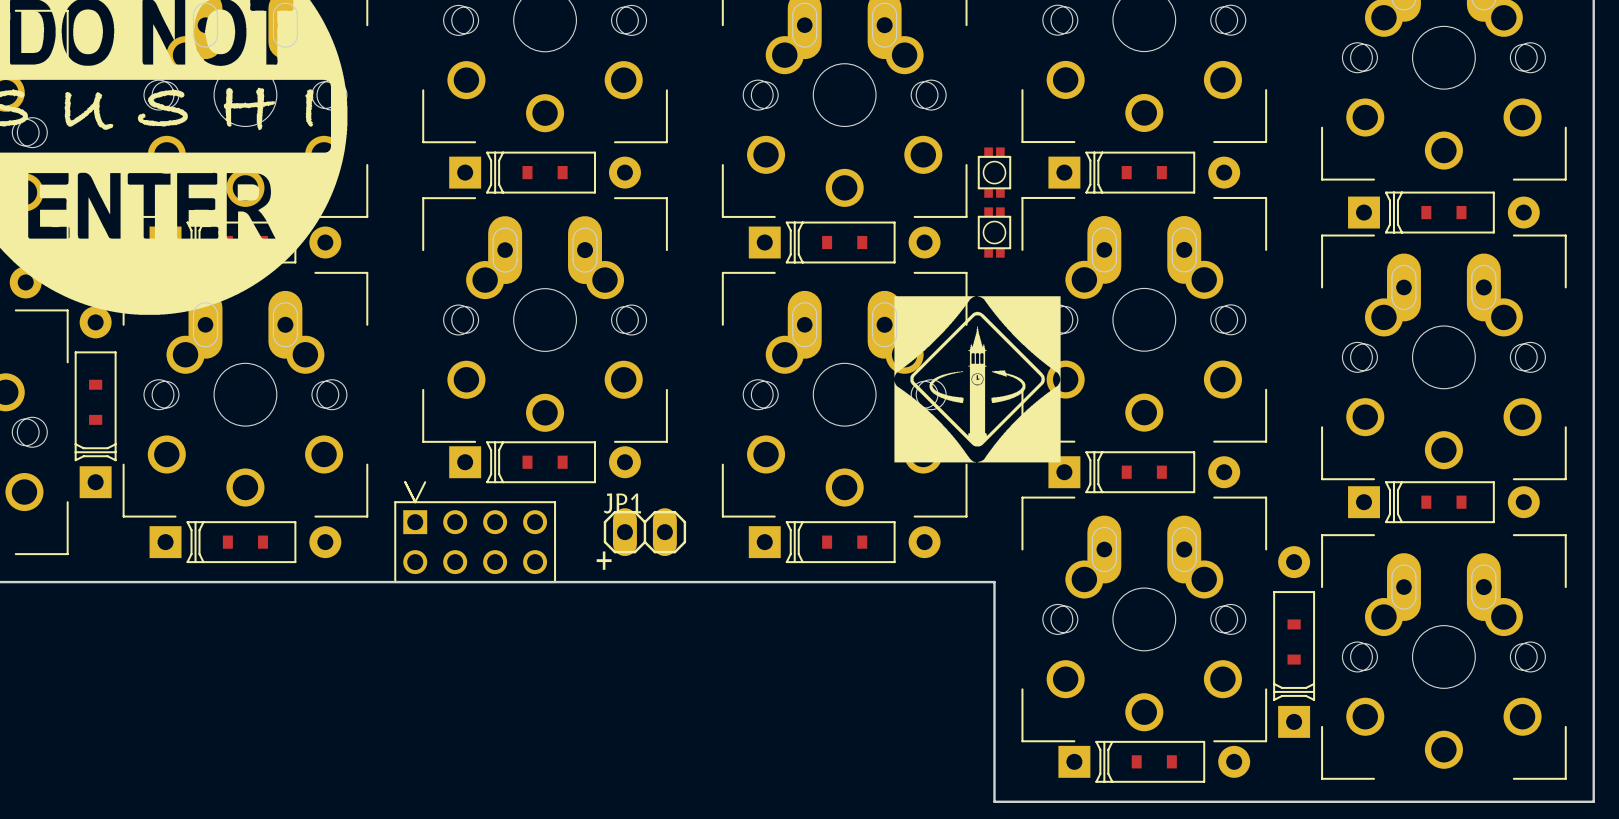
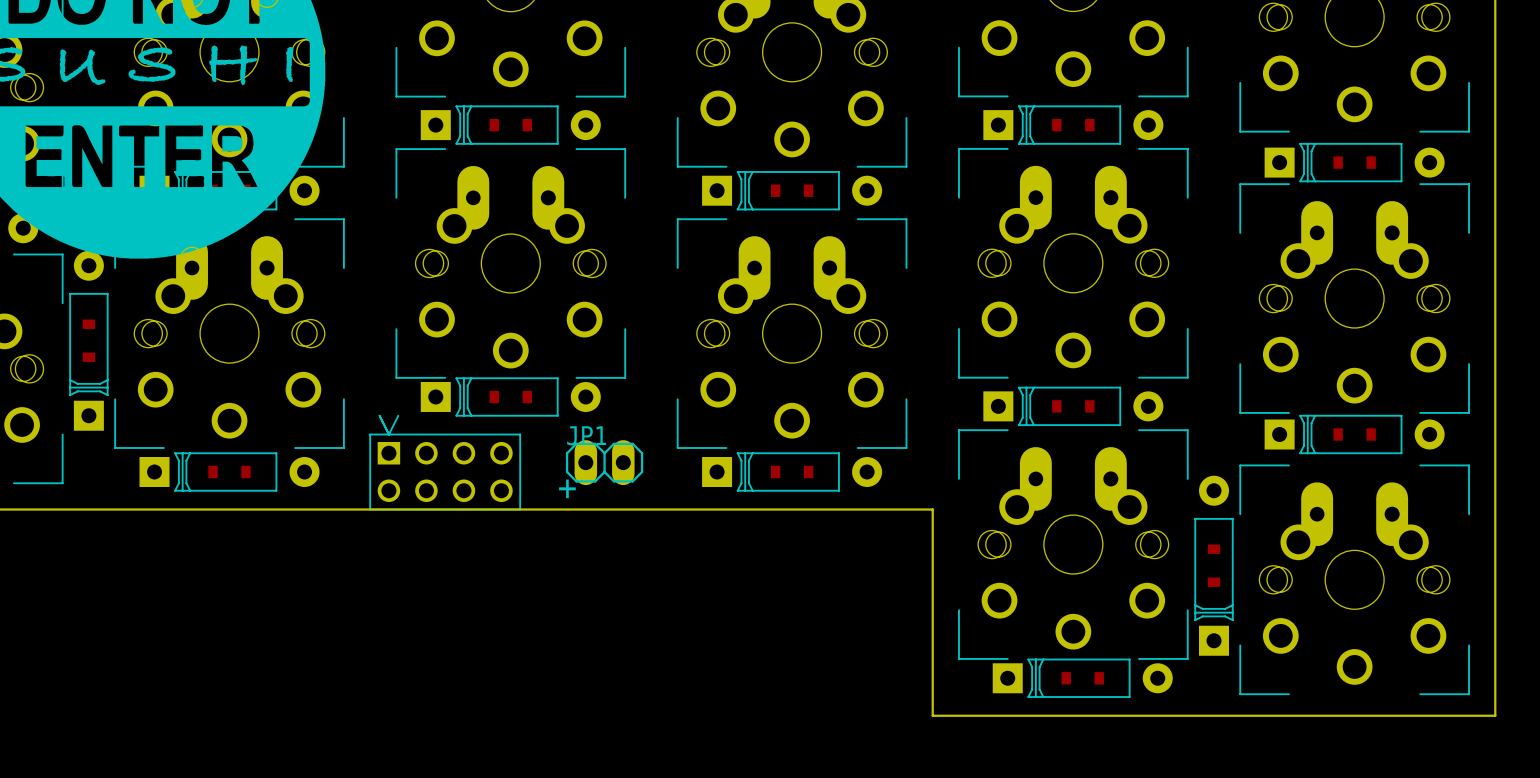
part: (994, 172) -> none
part: (994, 232) -> none
drawing: [894, 296, 1061, 463] -> none

